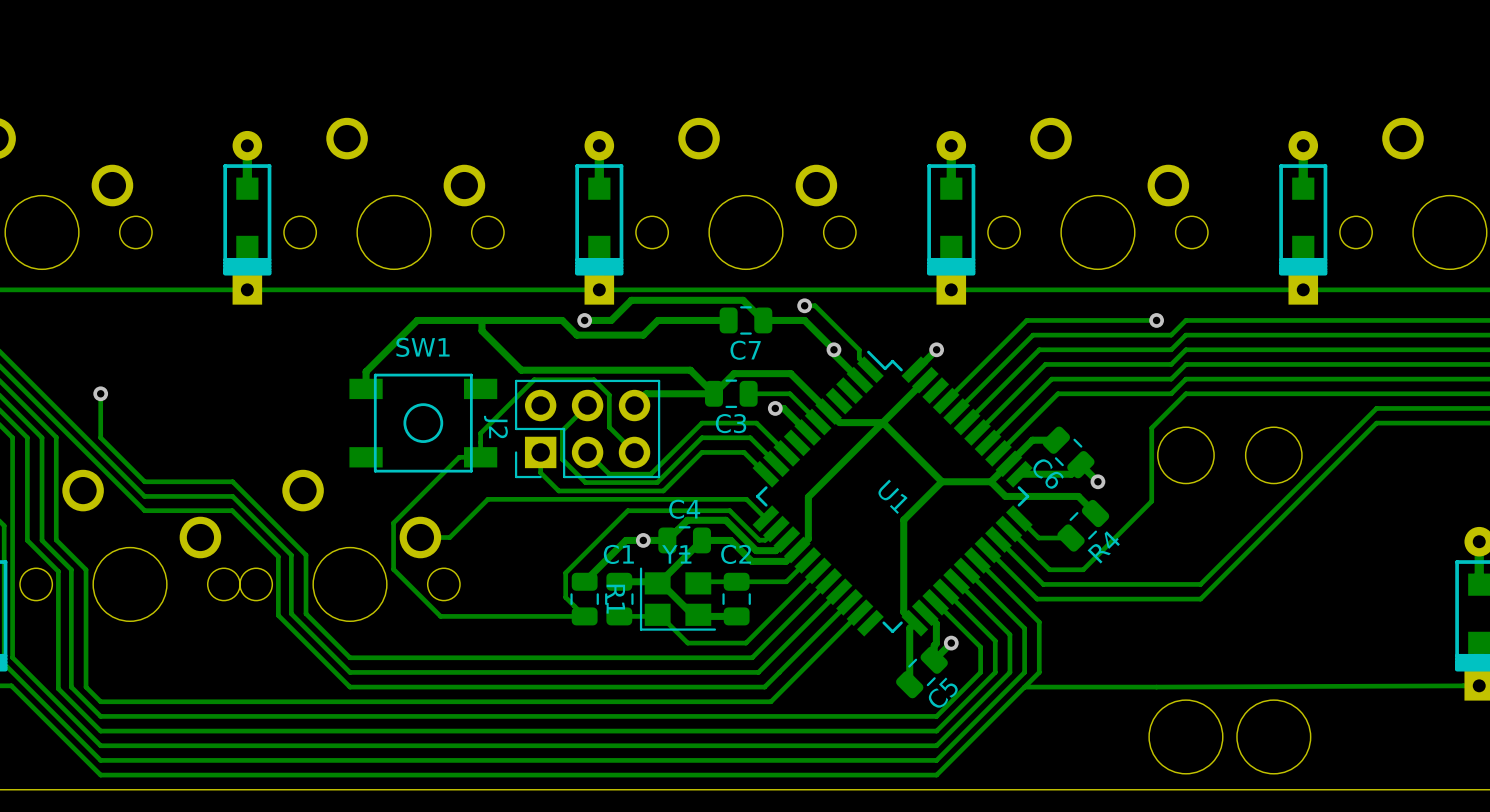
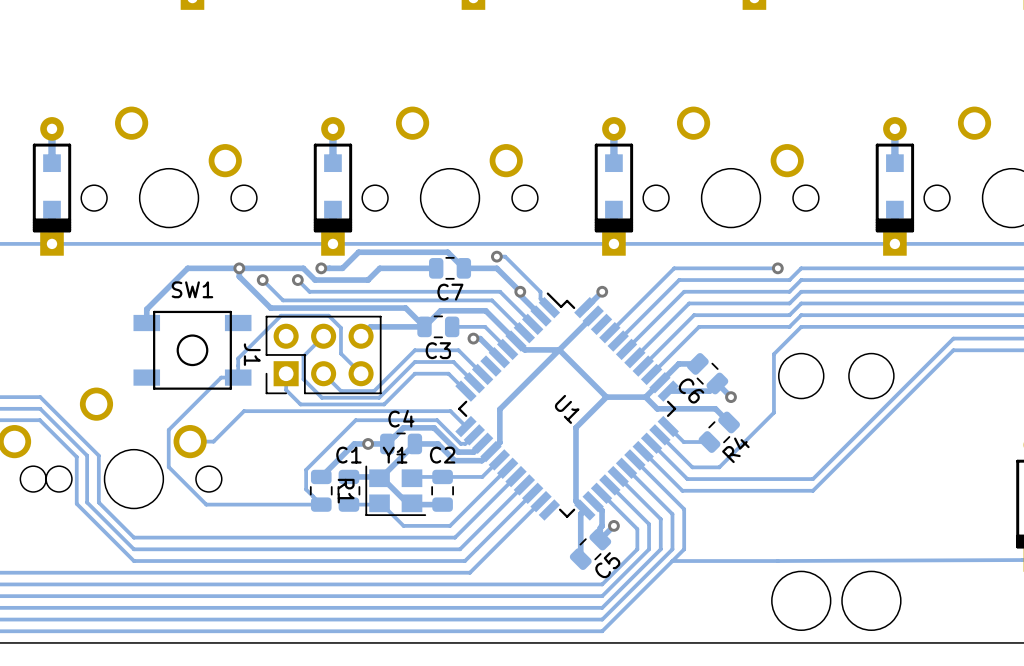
via: none -> (239, 268)
track: none -> (262, 280) (283, 300) (492, 300) (524, 332)
via: none -> (262, 280)
track: none -> (297, 280) (309, 291) (500, 291) (532, 324)
via: none -> (297, 280)
J2 name: J2 (495, 427) -> J1 (252, 354)

